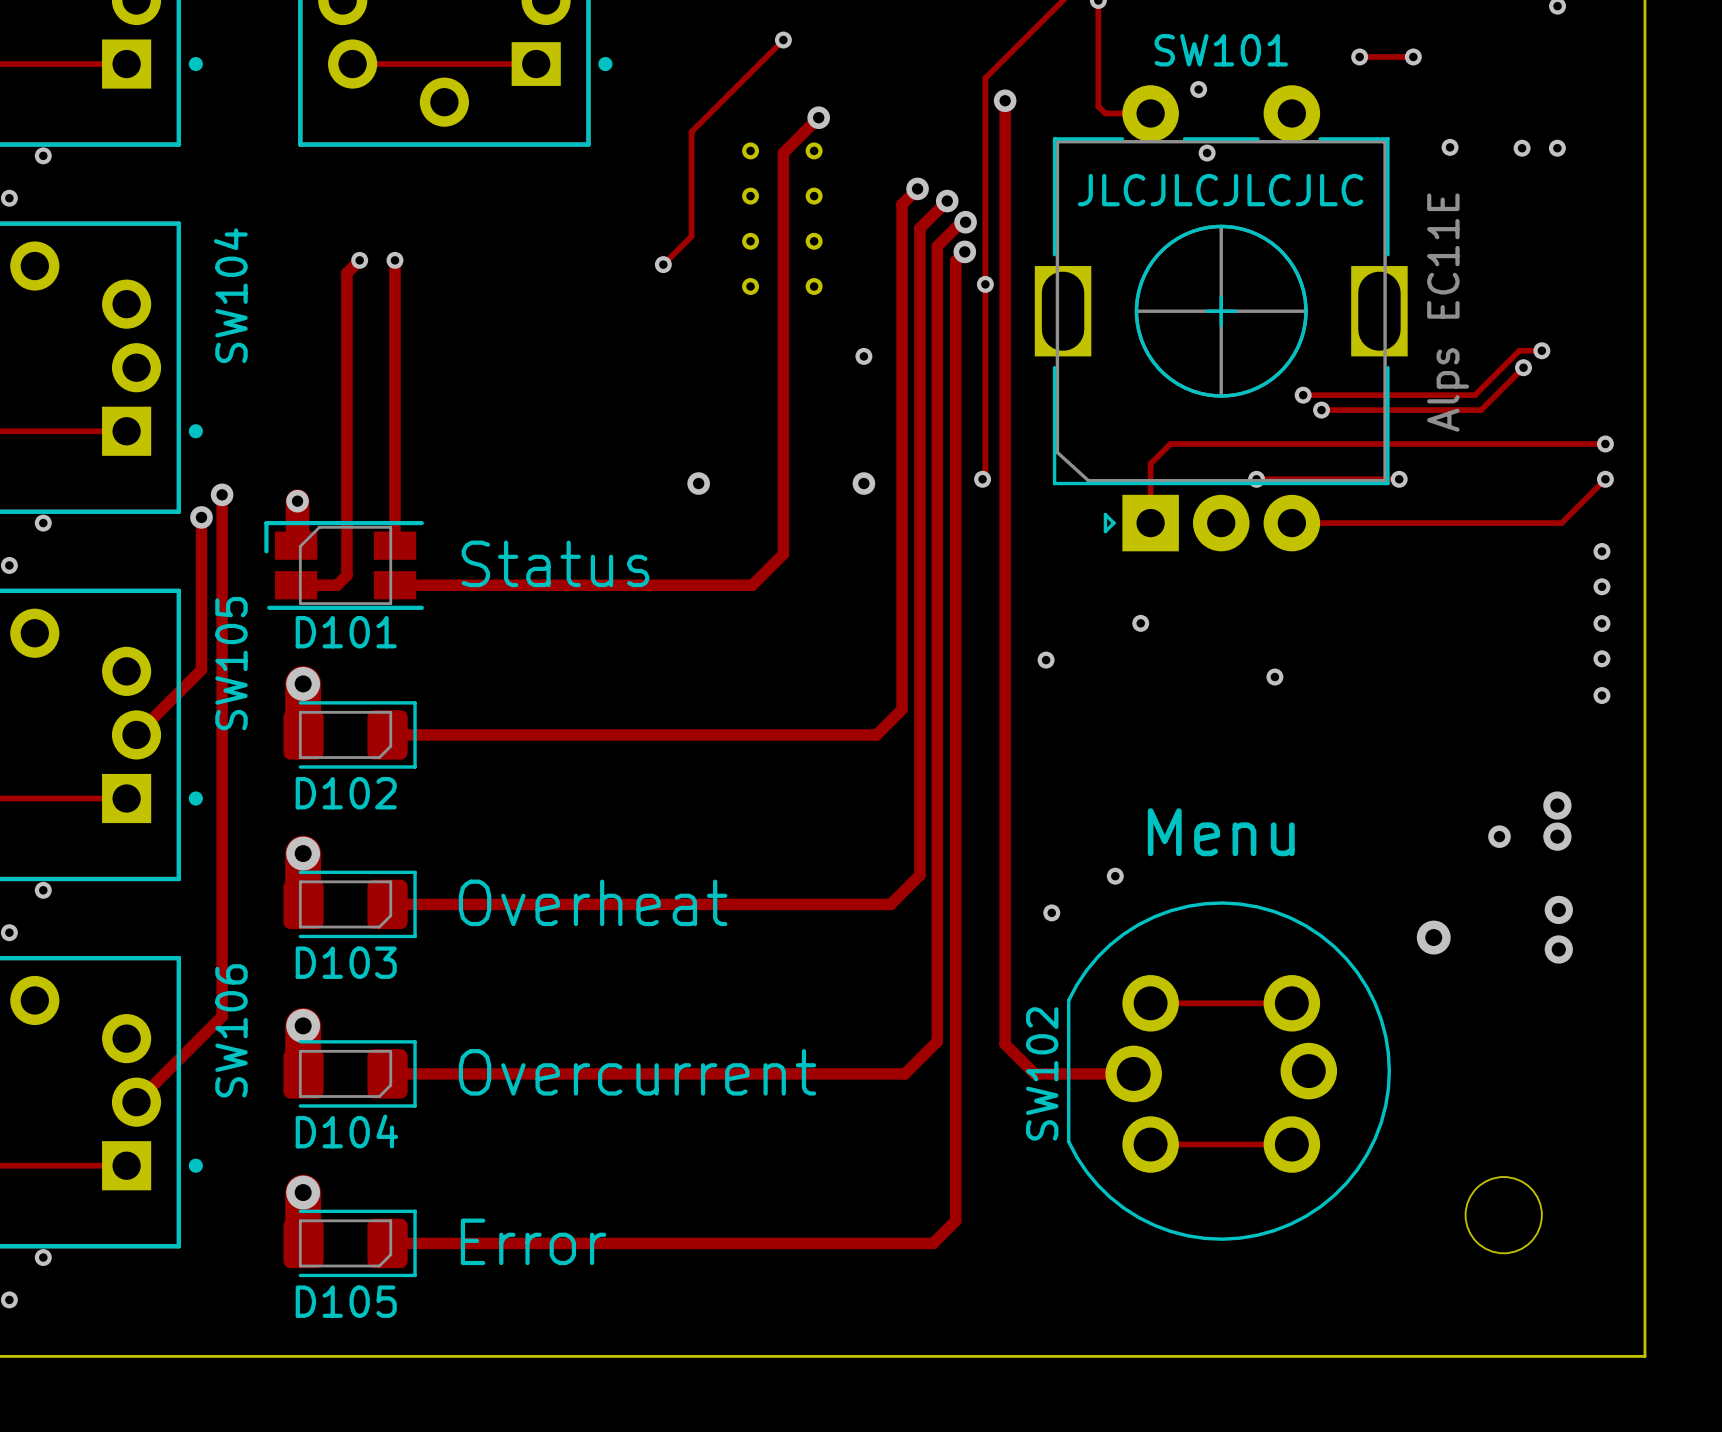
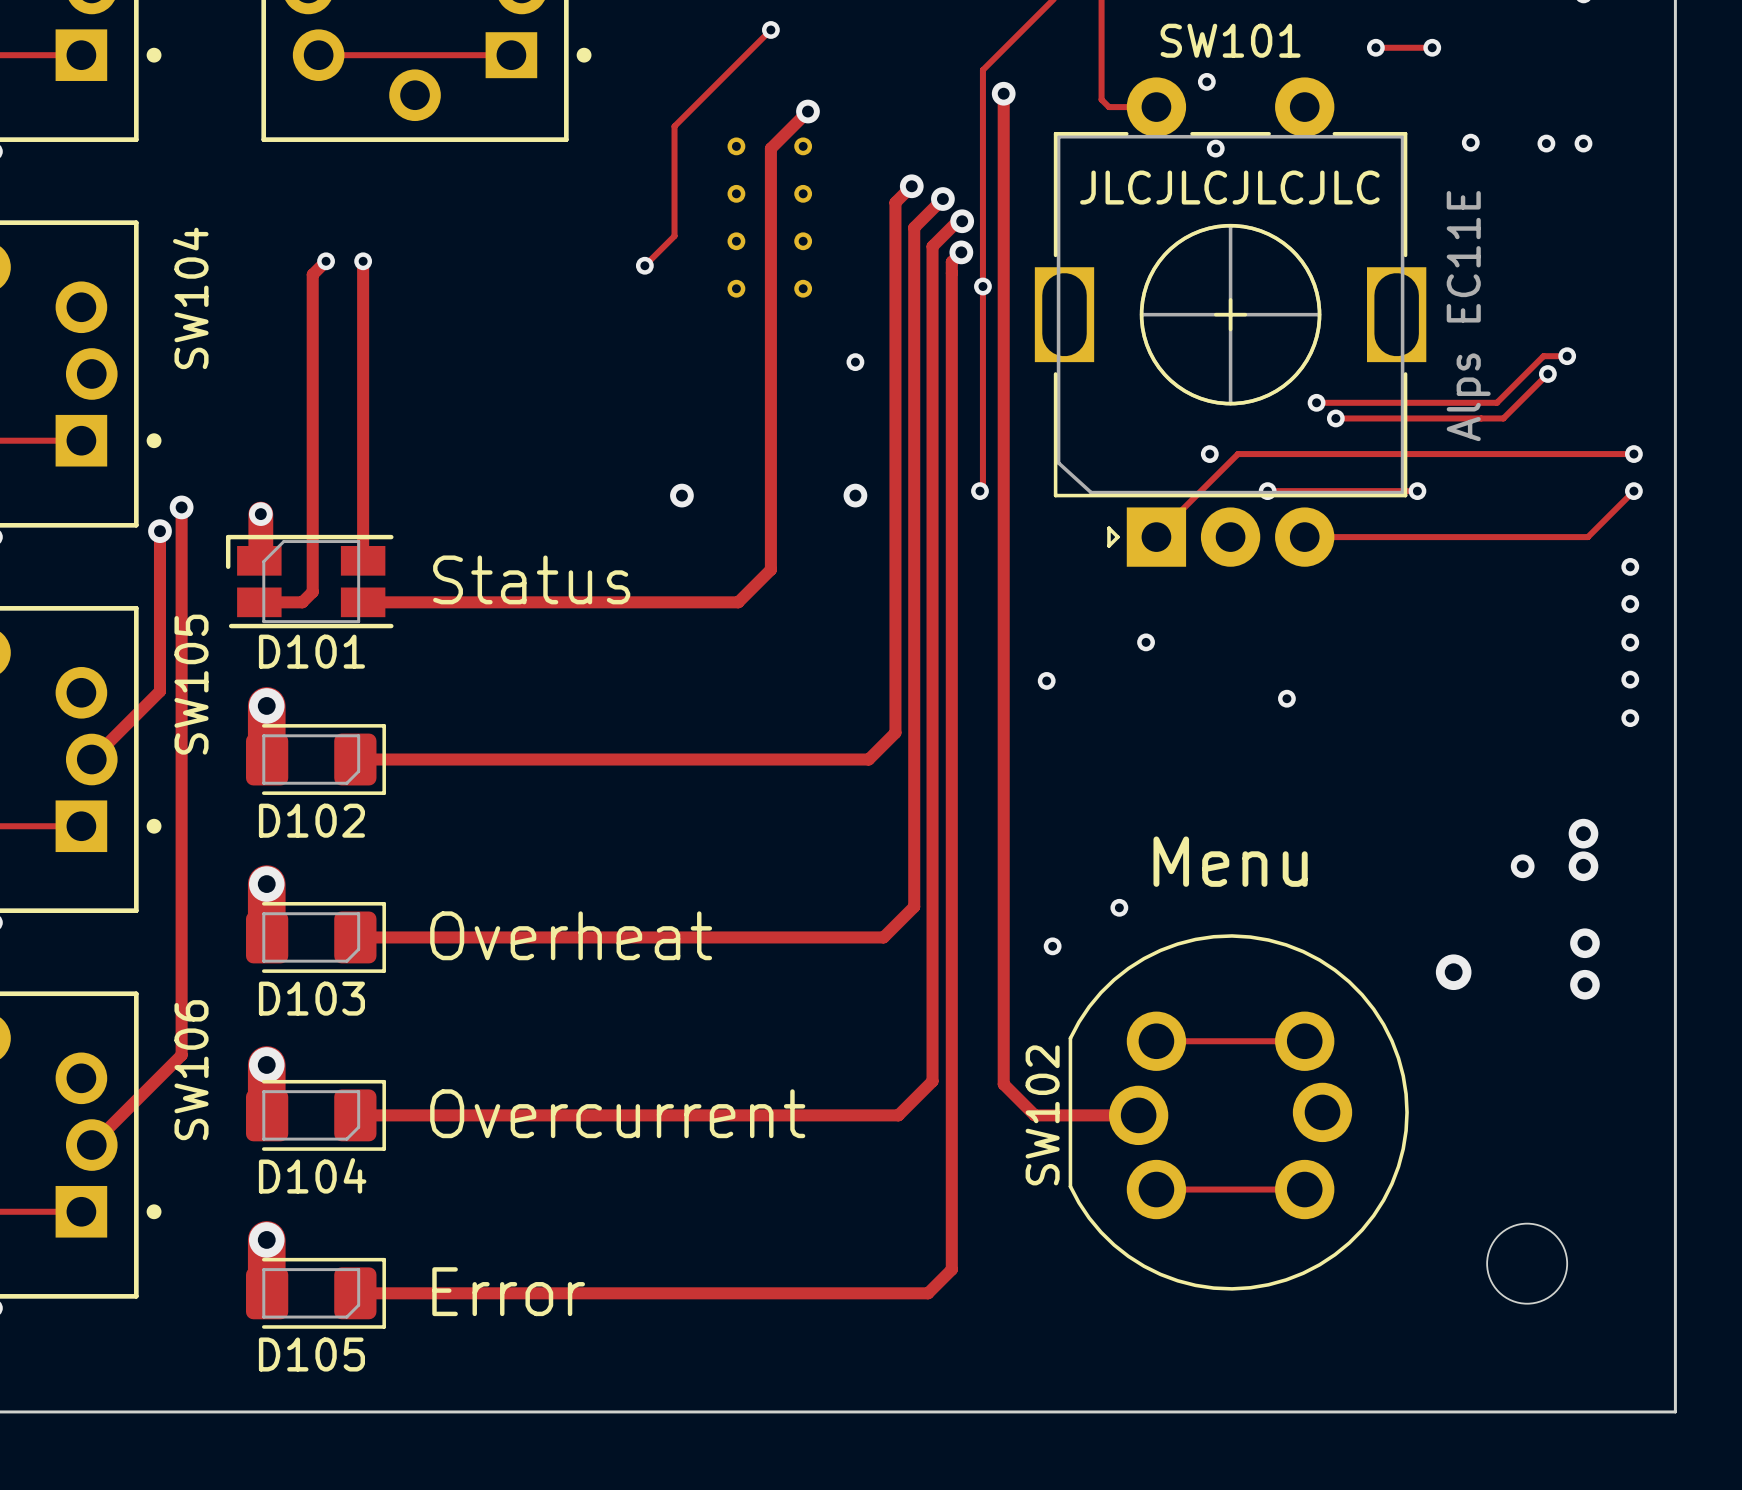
via: none -> (1209, 454)
track: (1228, 443) (1170, 443) (1150, 463) (1150, 521) -> (1237, 454) (1156, 535)

